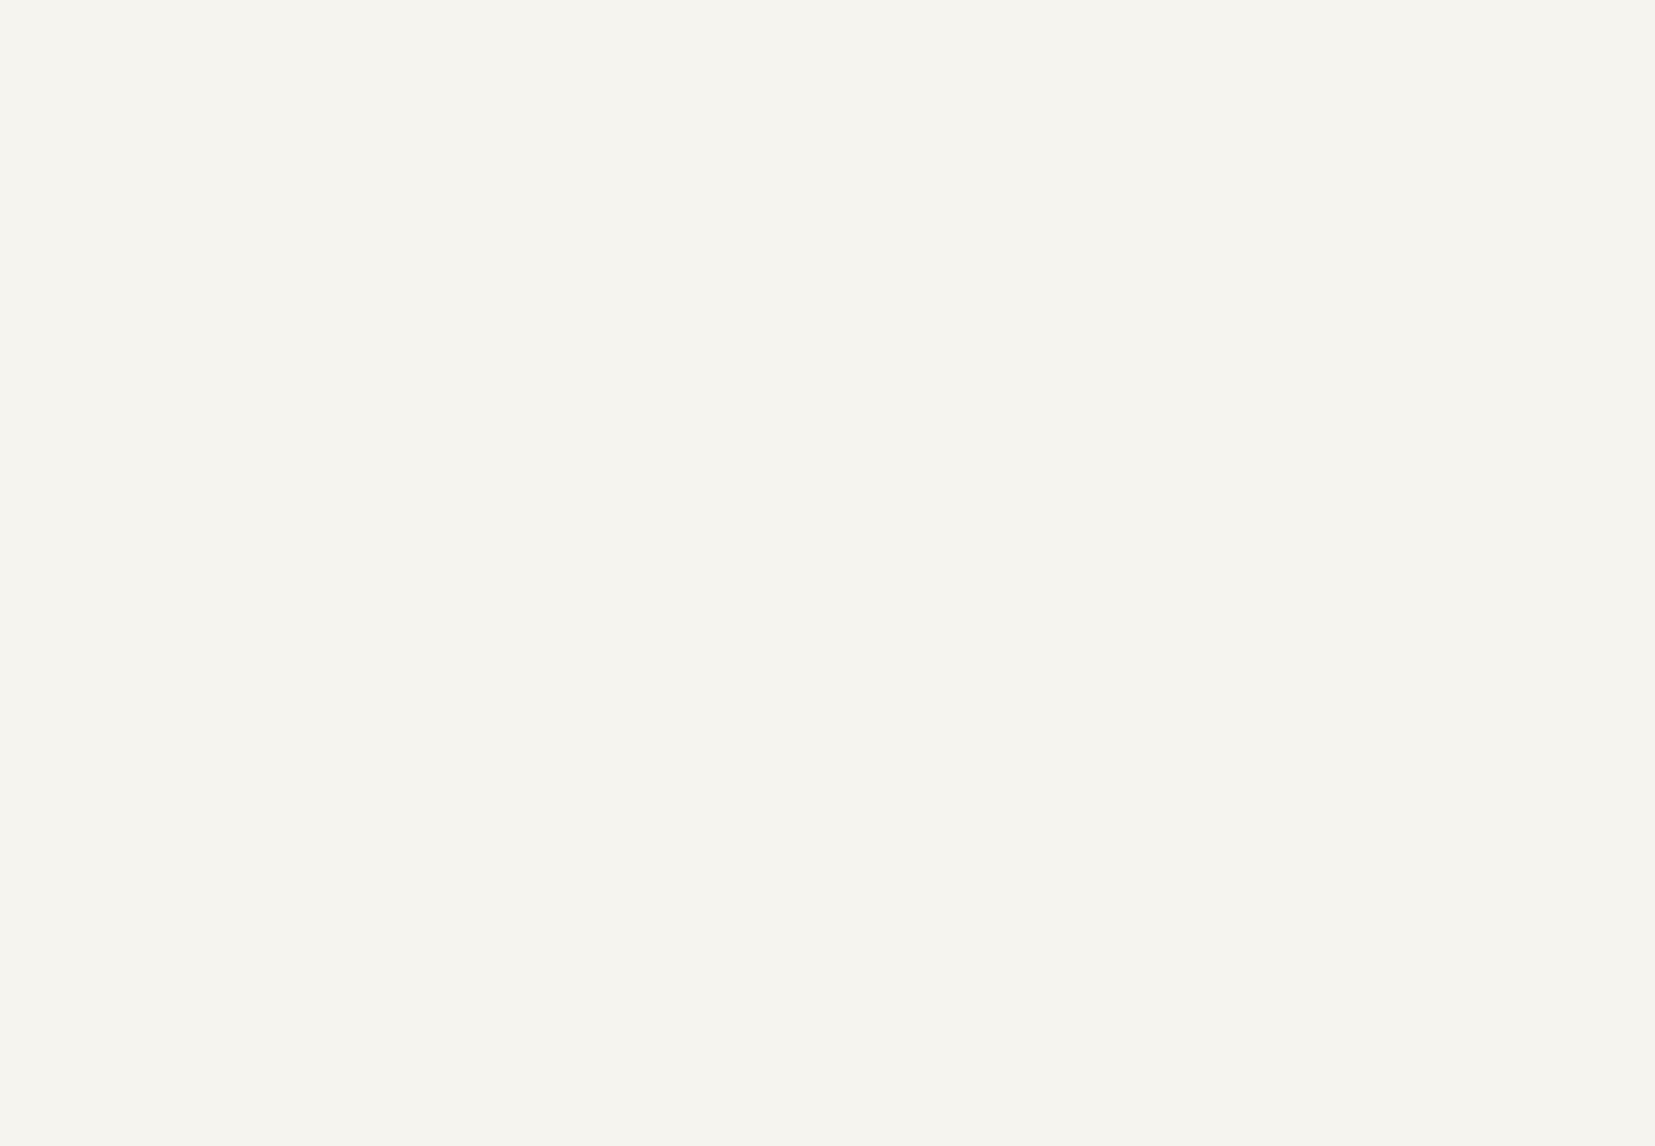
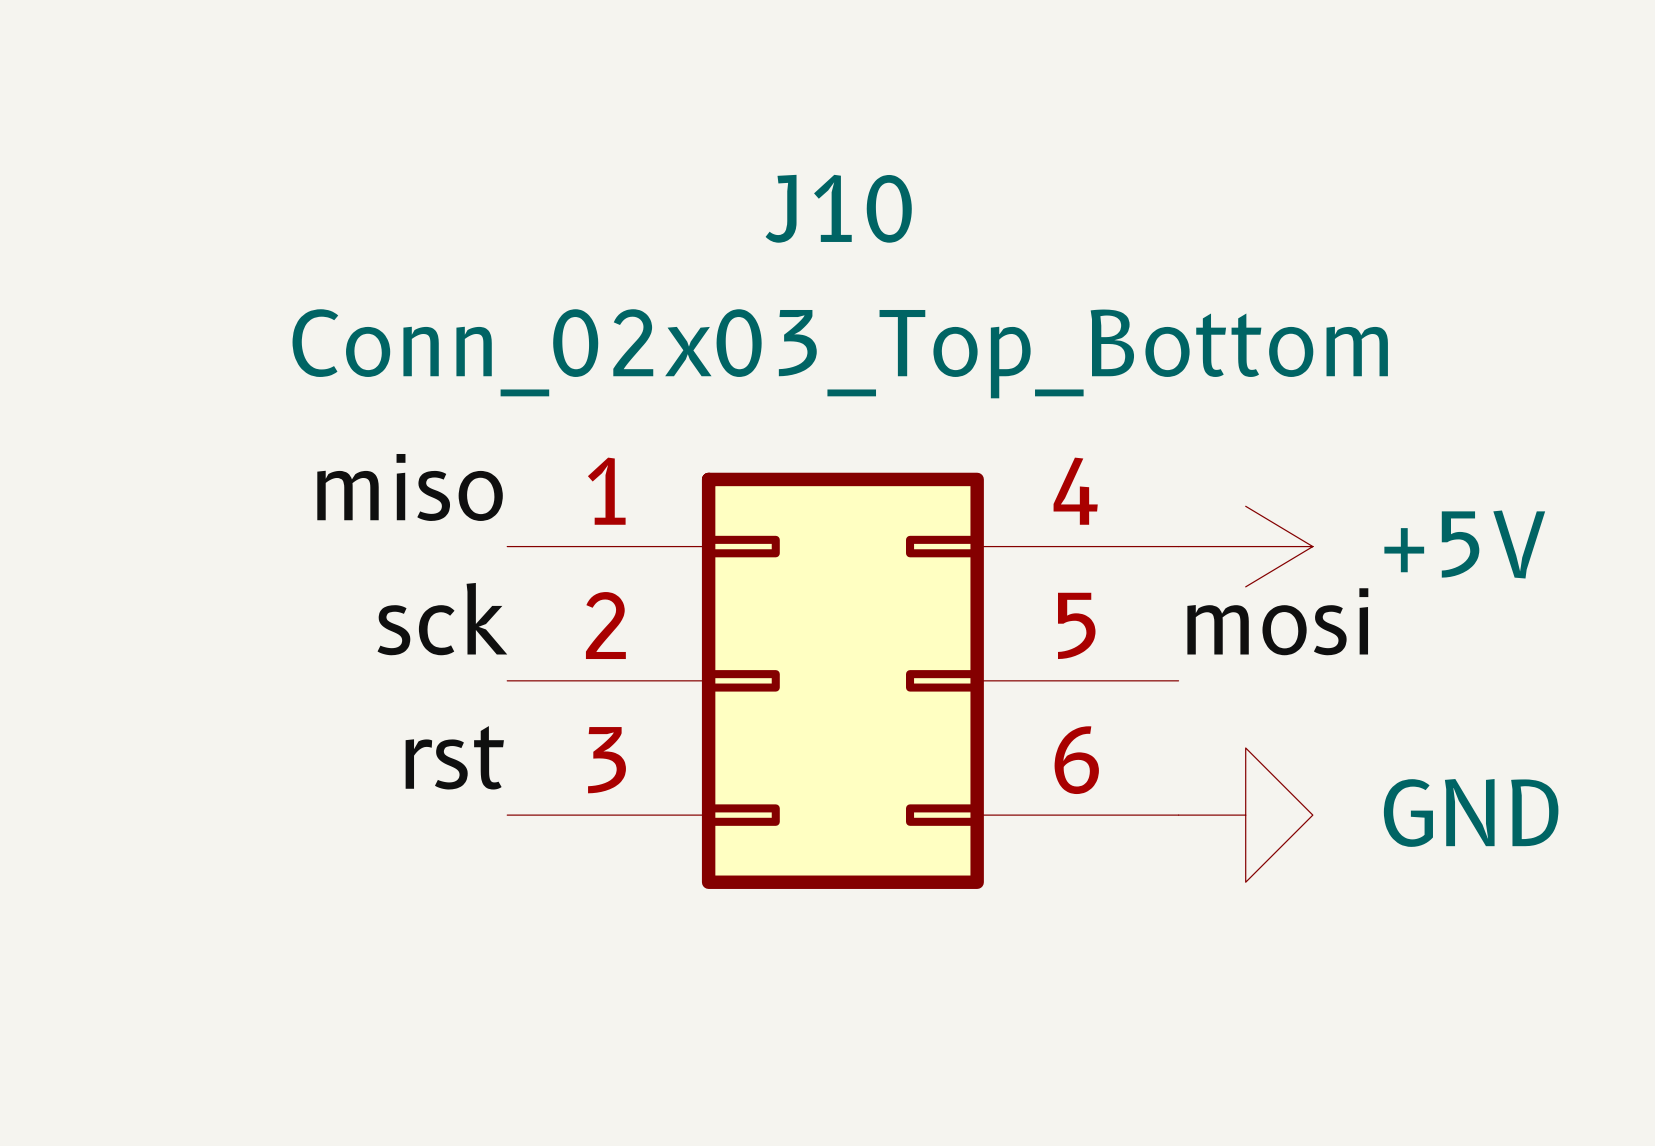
label: none -> miso (410, 487)
power symbol: none -> +5V (1245, 546)
label: none -> sck (442, 619)
label: none -> mosi (1277, 621)
J10: none -> Conn_02x03_Top_Bottom (842, 680)
label: none -> rst (454, 757)
power symbol: none -> GND (1245, 815)

